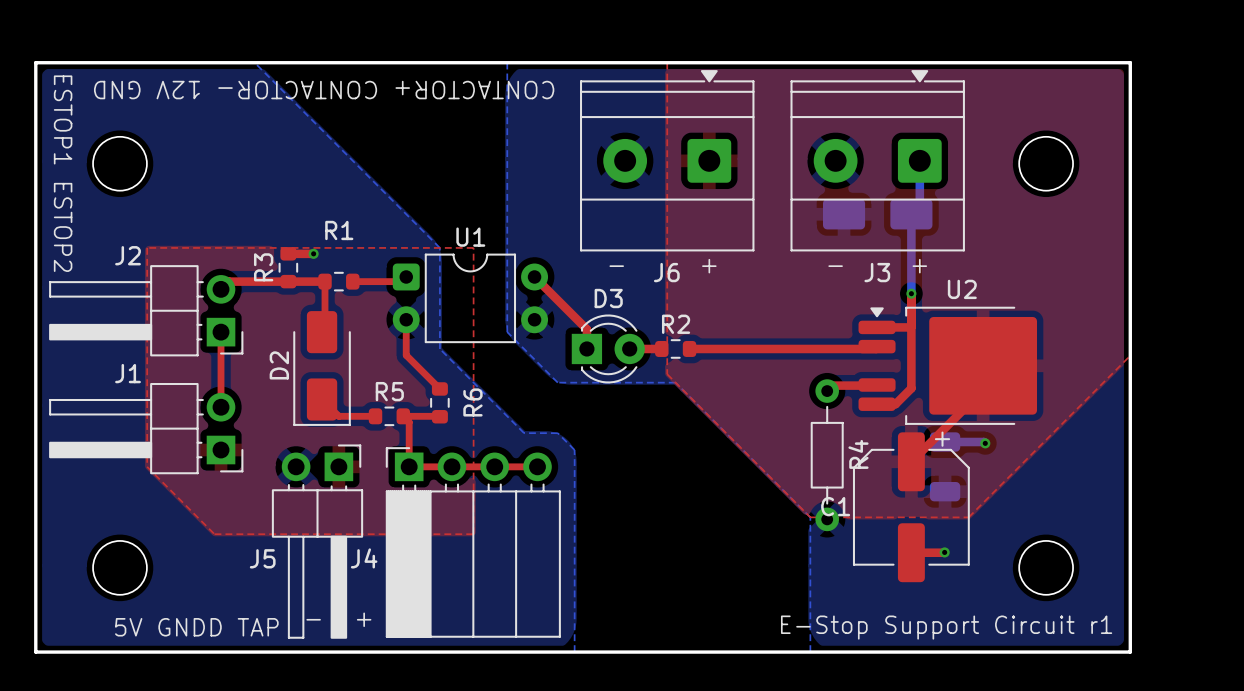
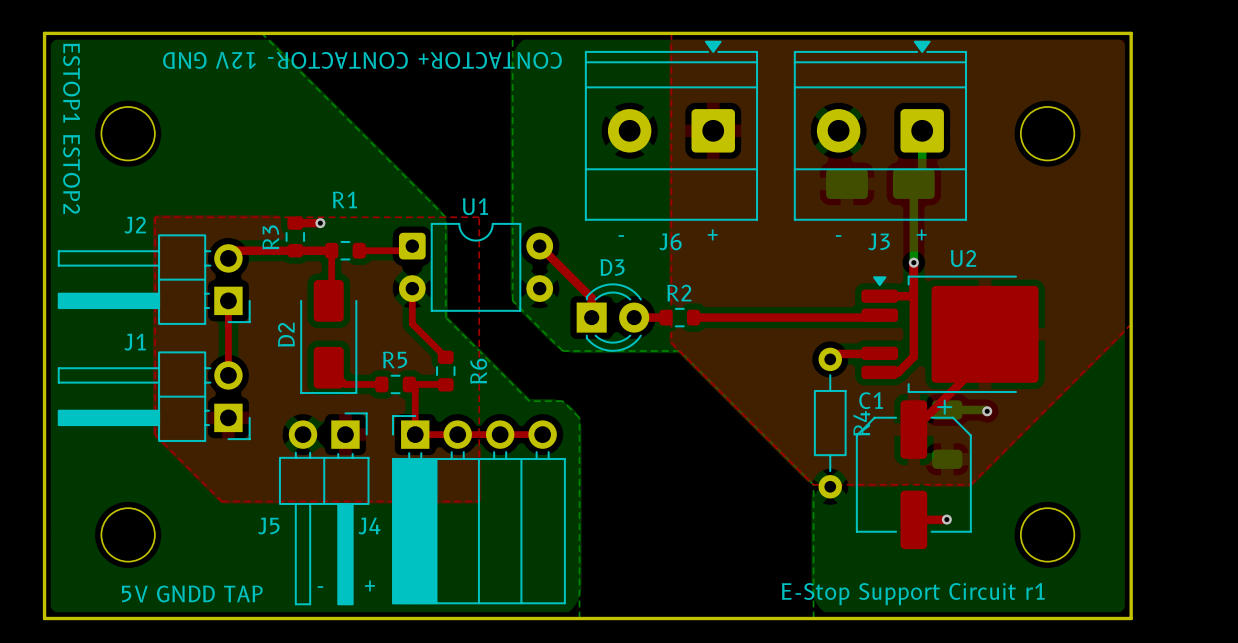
C1 name position: C1 (835, 506) -> C1 (871, 400)

